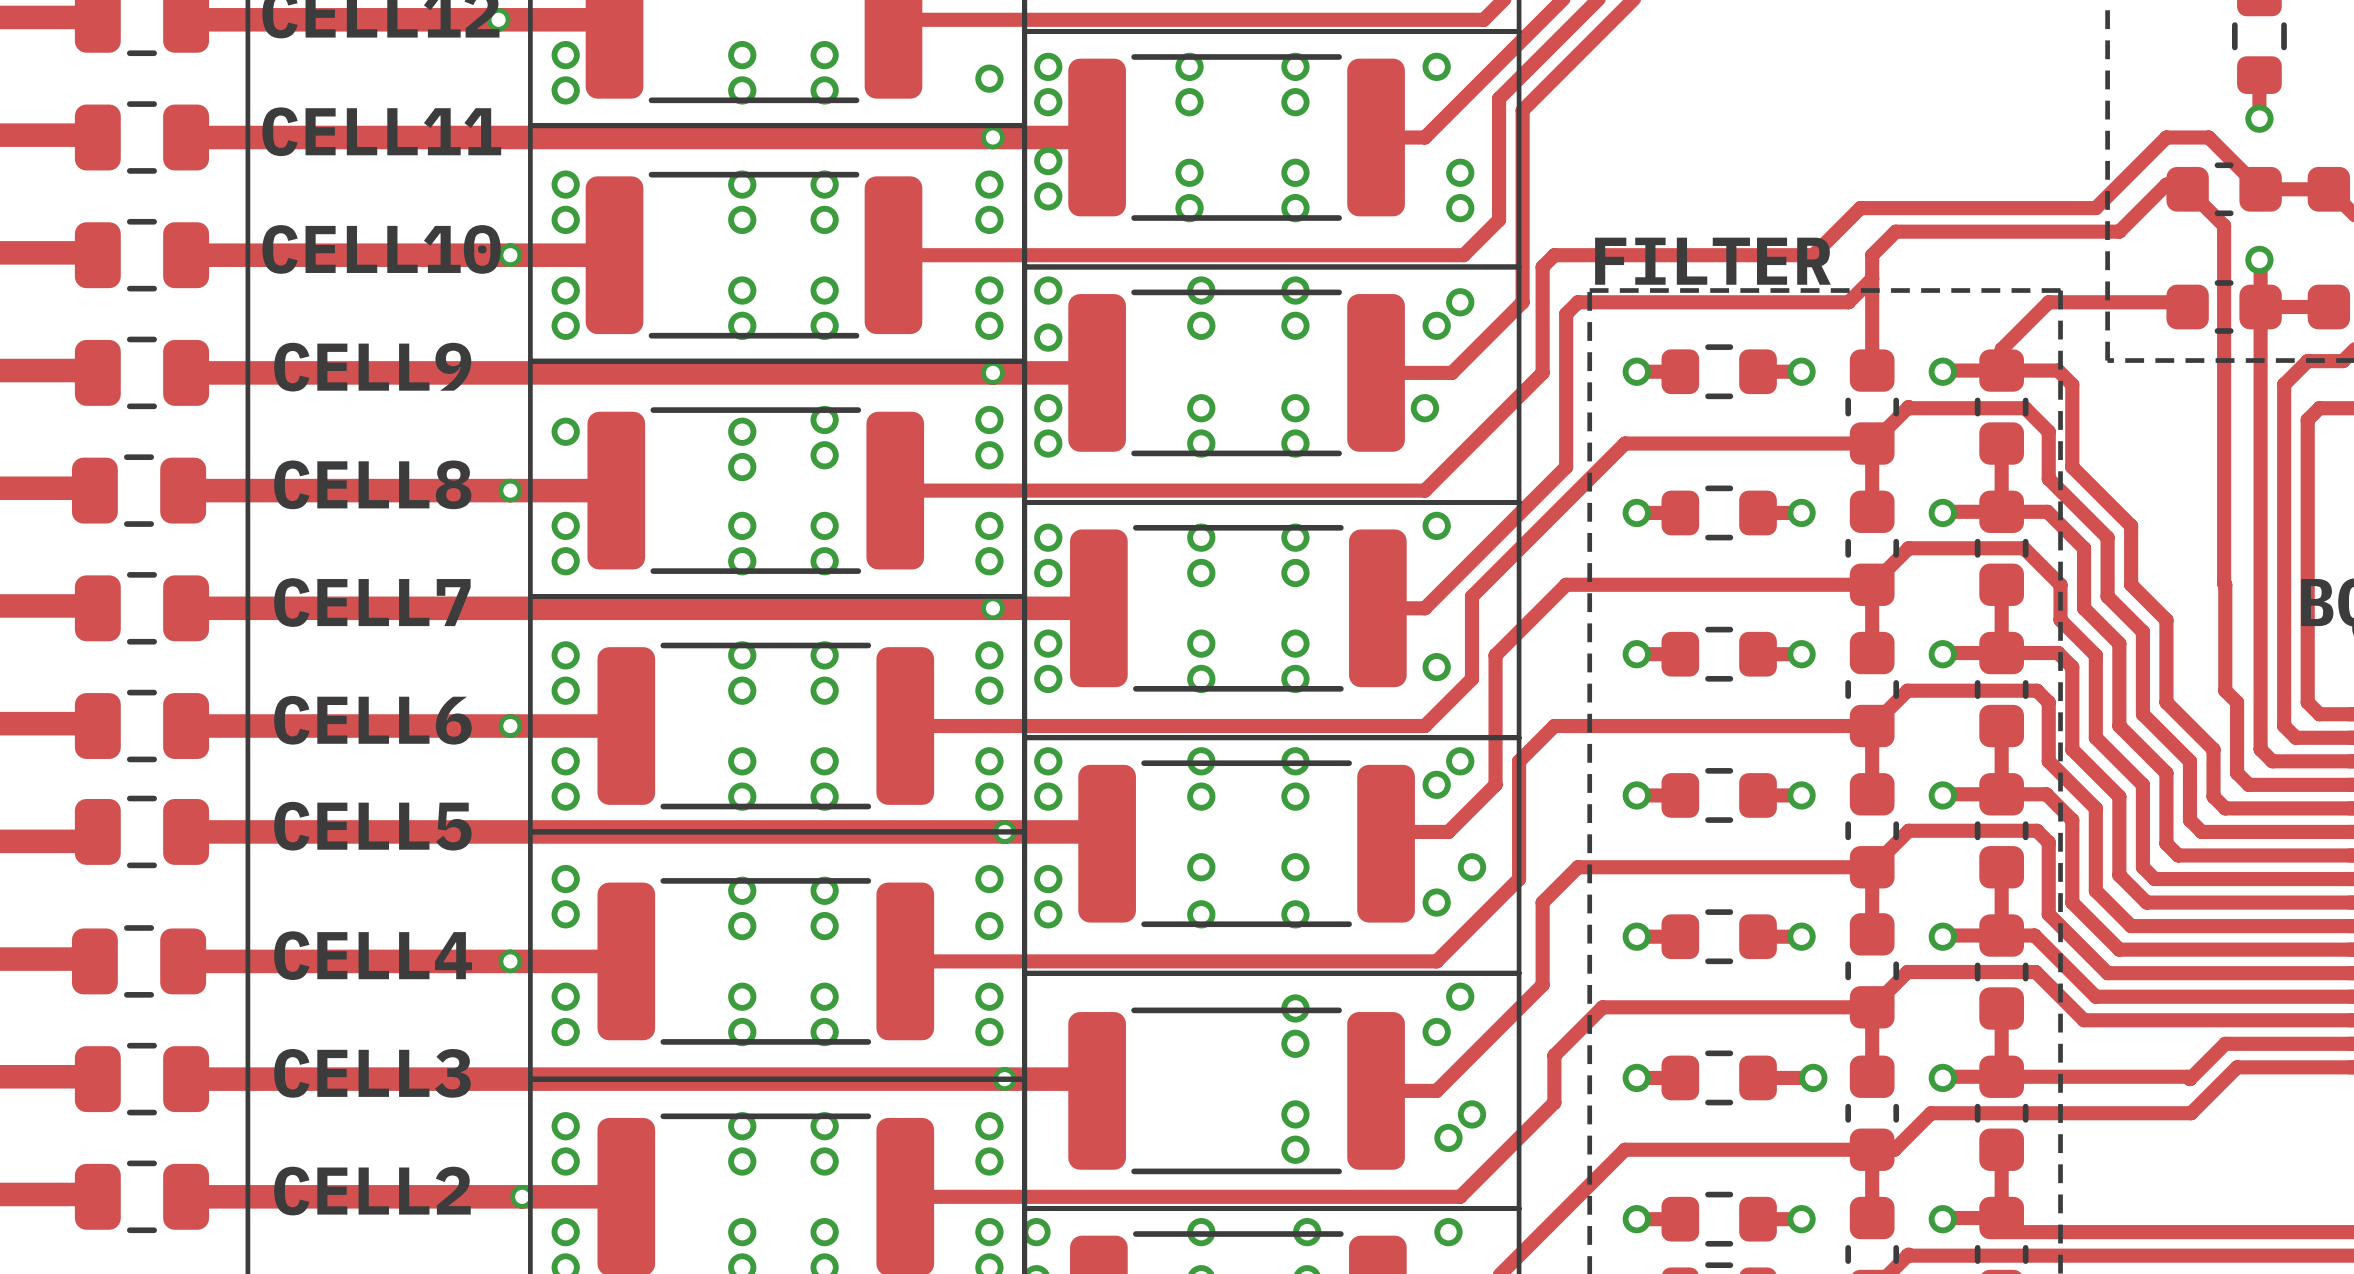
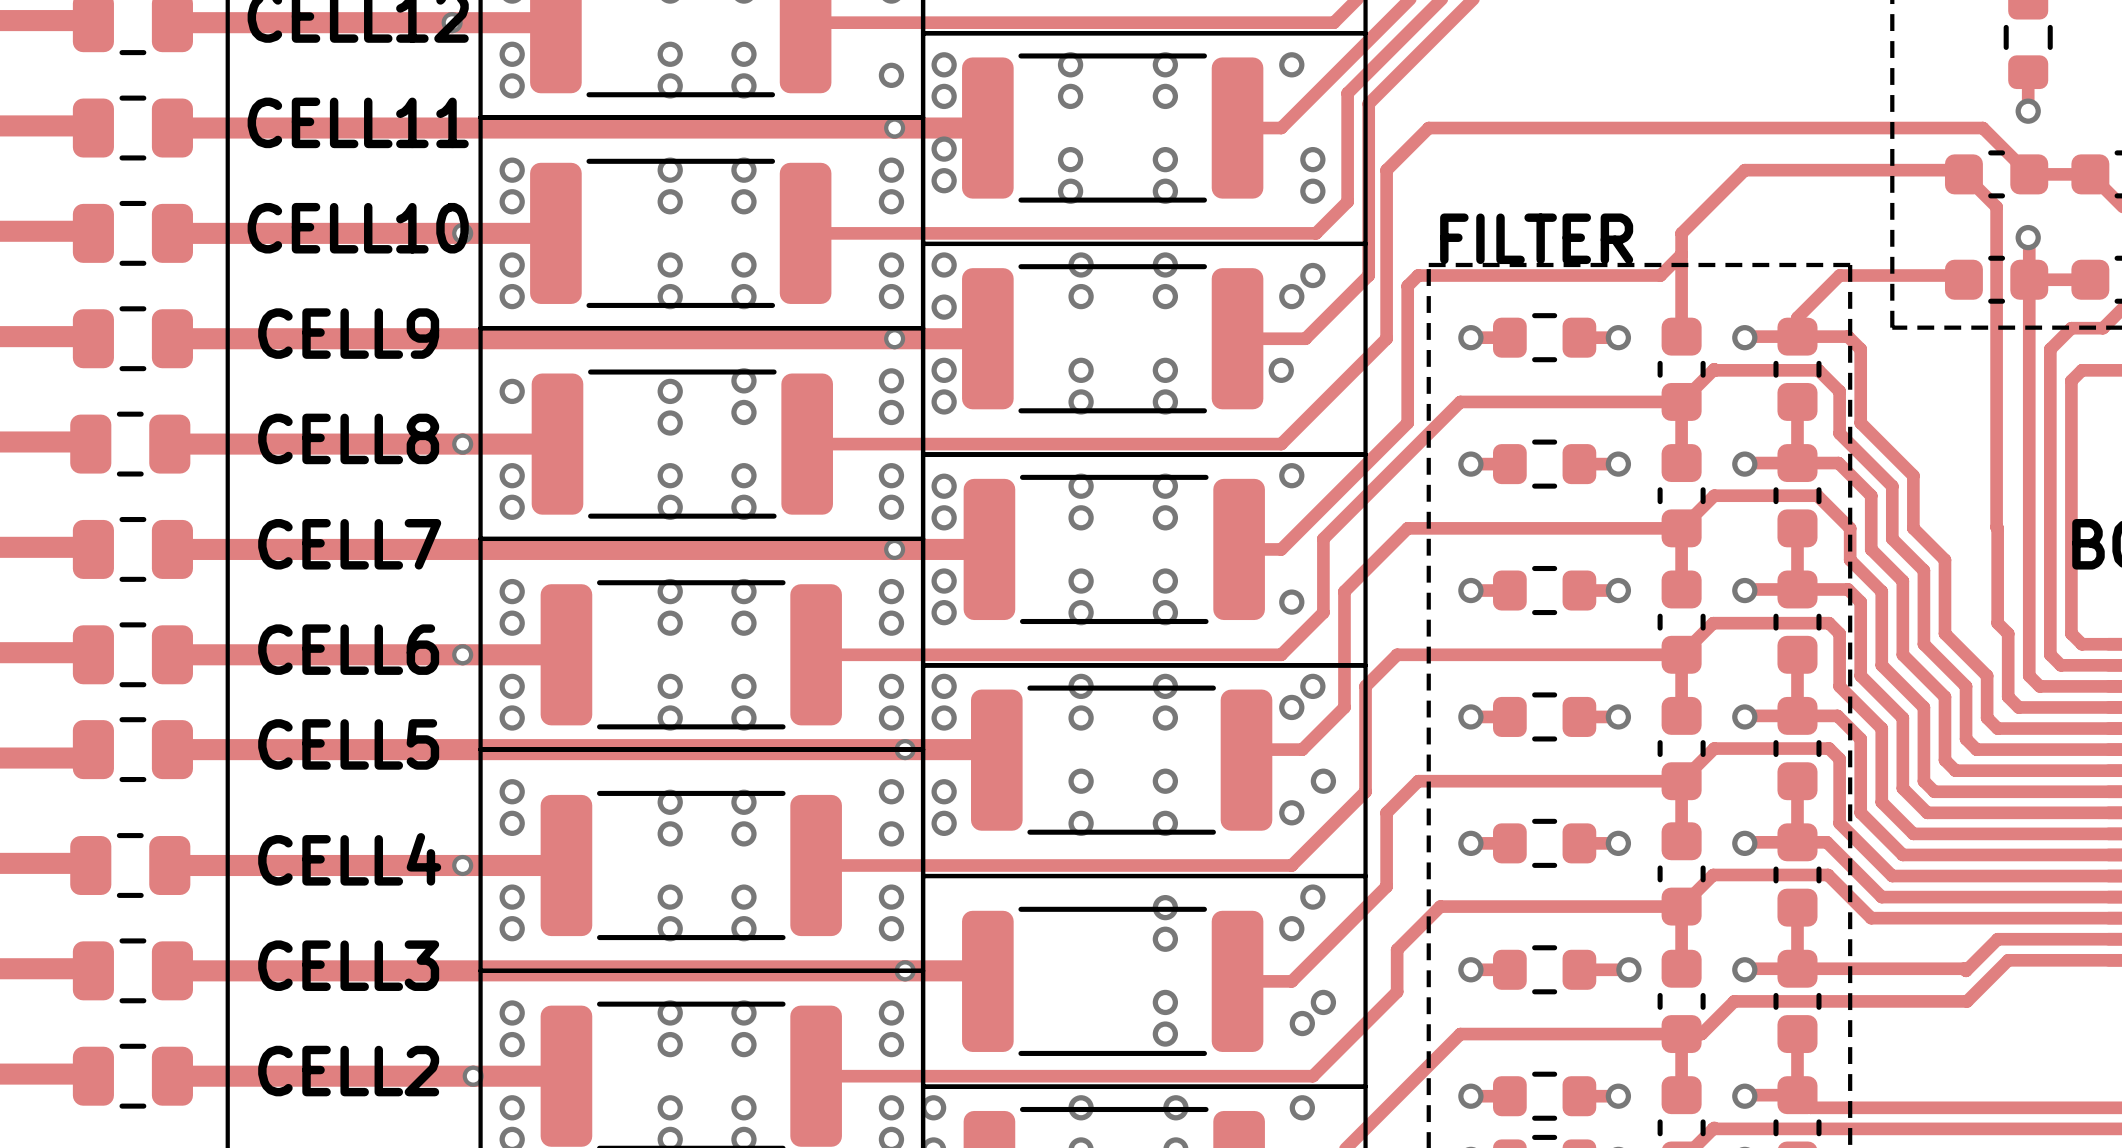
track: (2166, 137) (2095, 208) (1860, 208) (1813, 255) (1554, 255) (1542, 266) -> (1944, 128) (1428, 128) (1386, 170) (1386, 243)
track: (2166, 184) (2119, 231) (1895, 231) -> (1944, 170) (1744, 170) (1702, 212)

